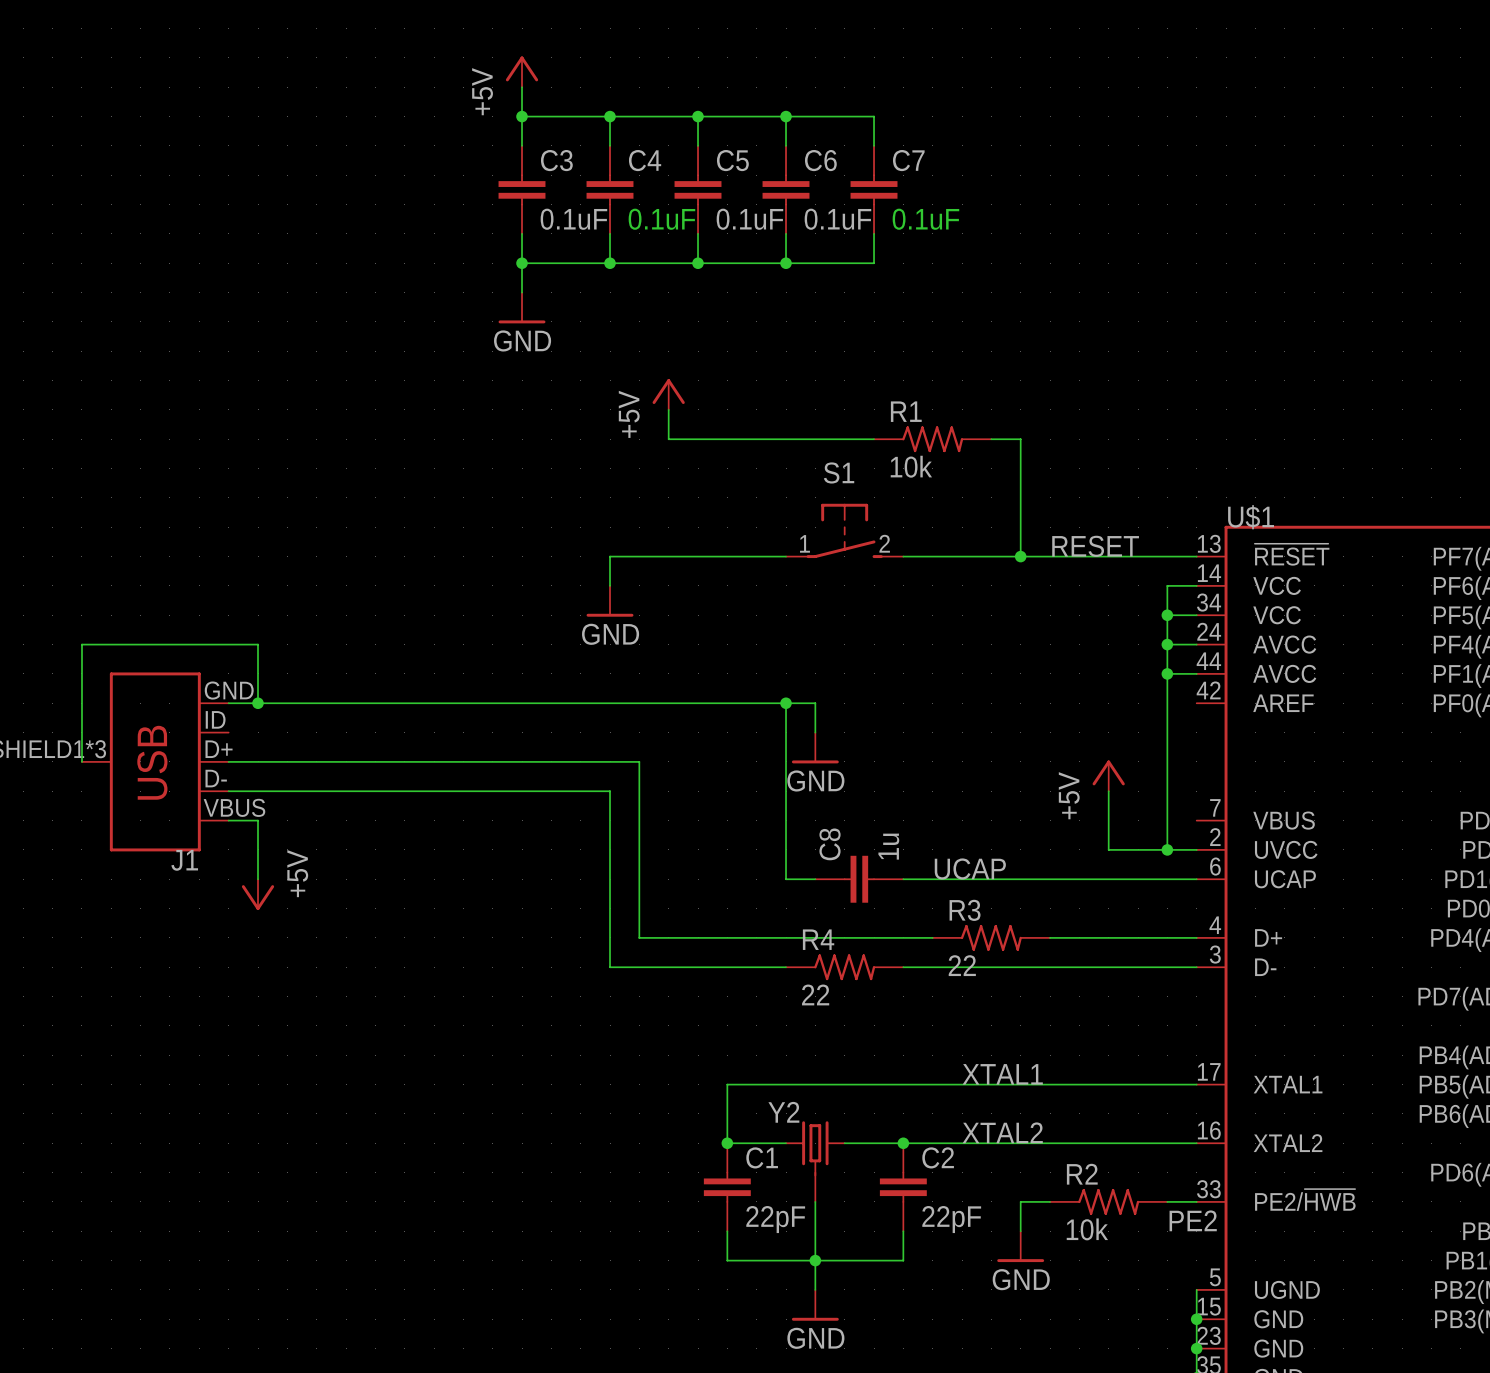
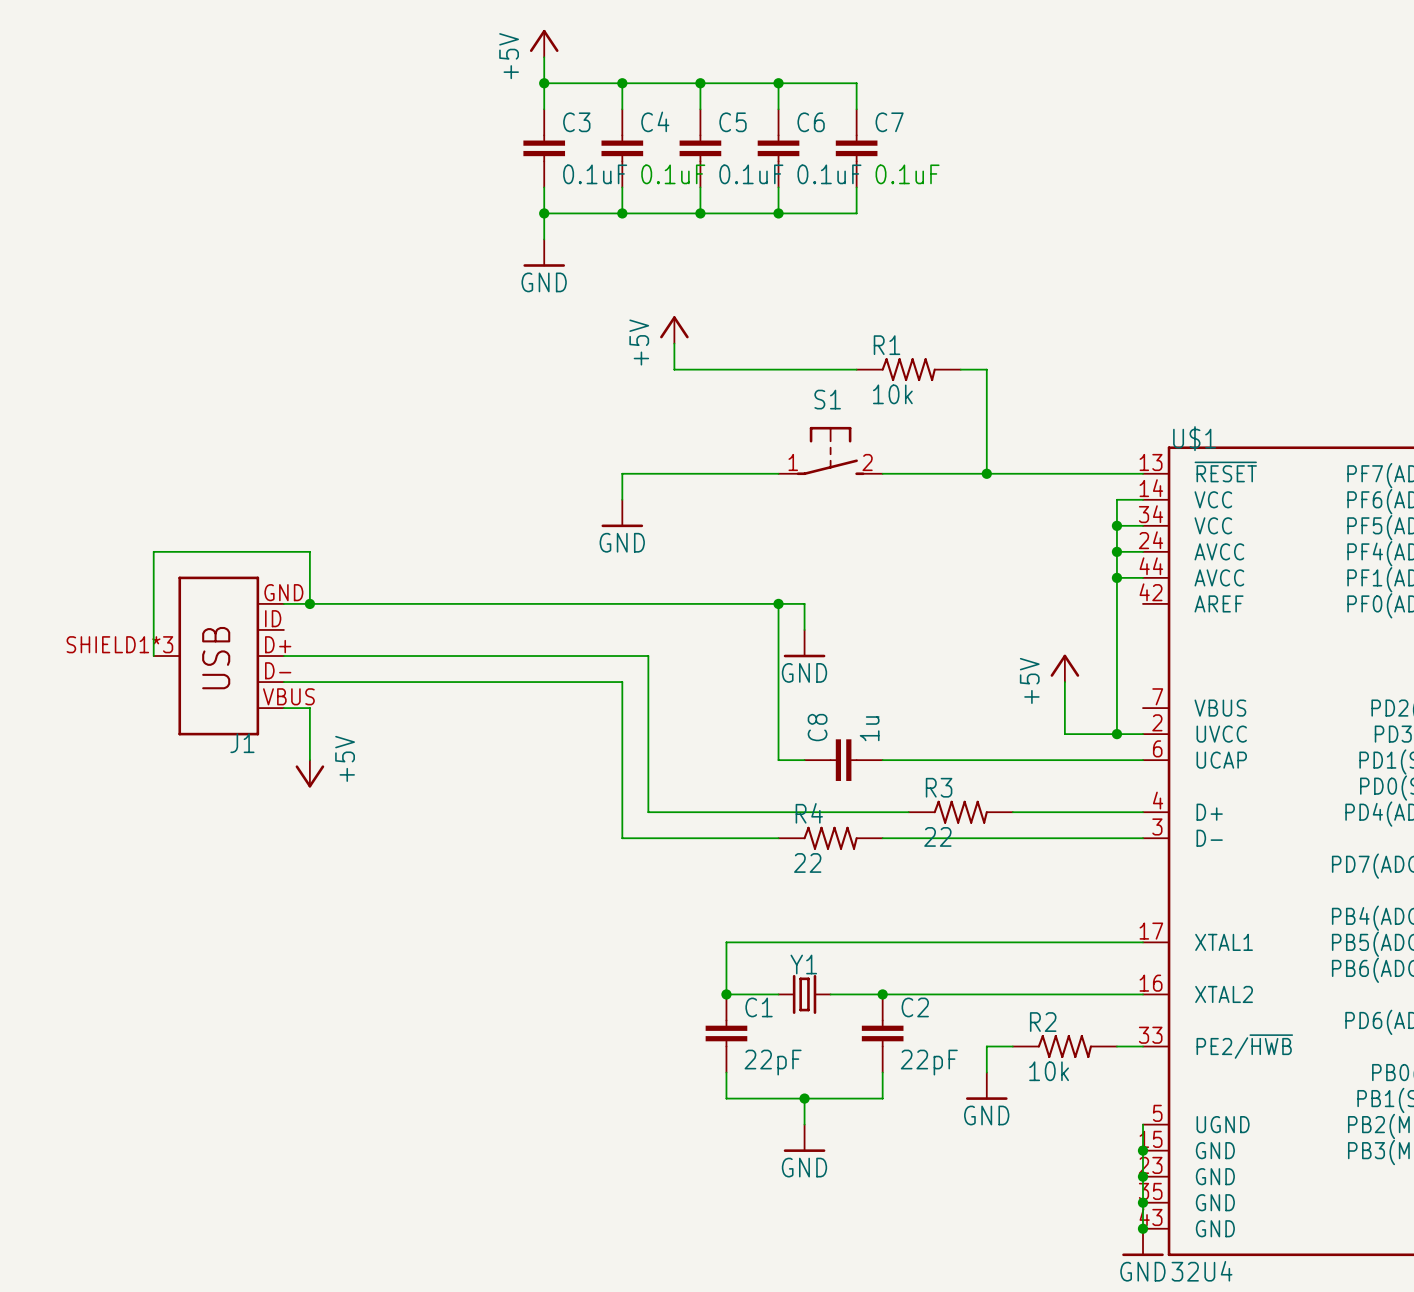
label: RESET (1095, 546) -> none
label: UCAP (970, 868) -> none
label: XTAL1 (1002, 1074) -> none
label: XTAL2 (1002, 1132) -> none
Y1: none -> (804, 994)
Y2: (815, 1161) -> none
wire: (815, 1201) (815, 1260) -> none
label: PE2 (1193, 1220) -> none

